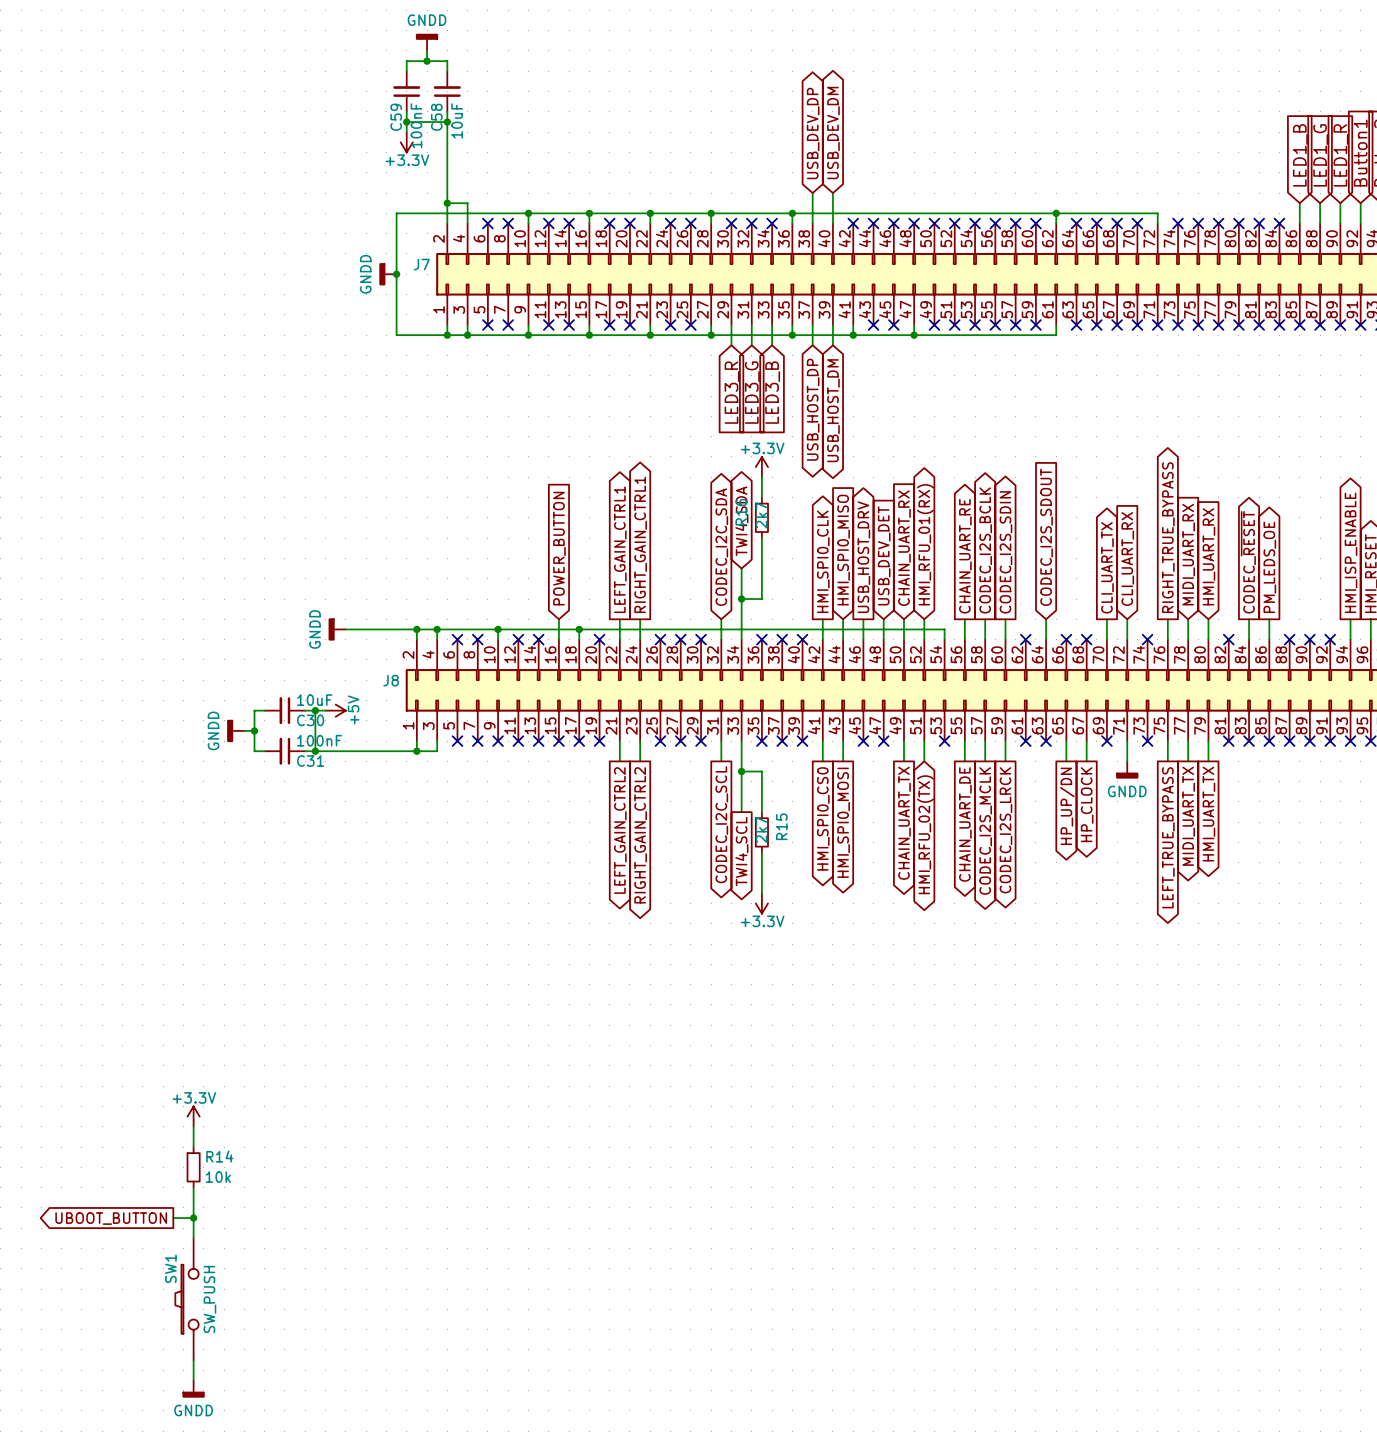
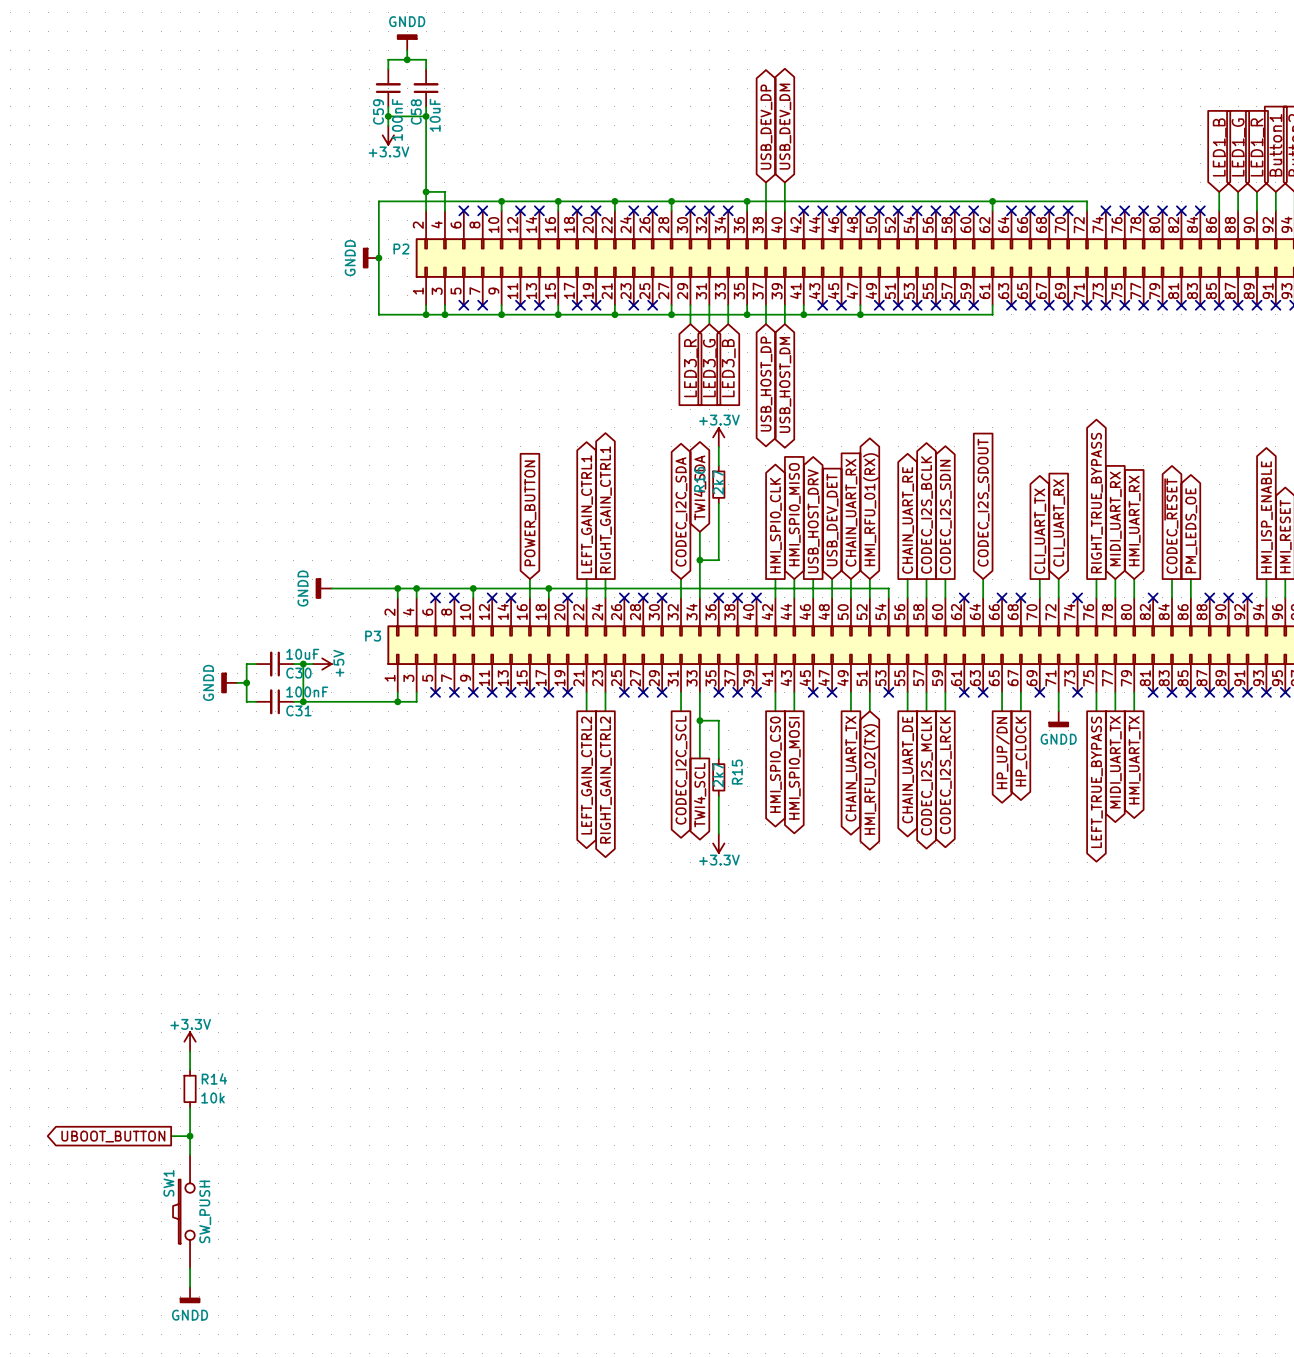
J7 name: J7 (421, 264) -> P2 (401, 248)
J8 name: J8 (391, 680) -> P3 (373, 636)

